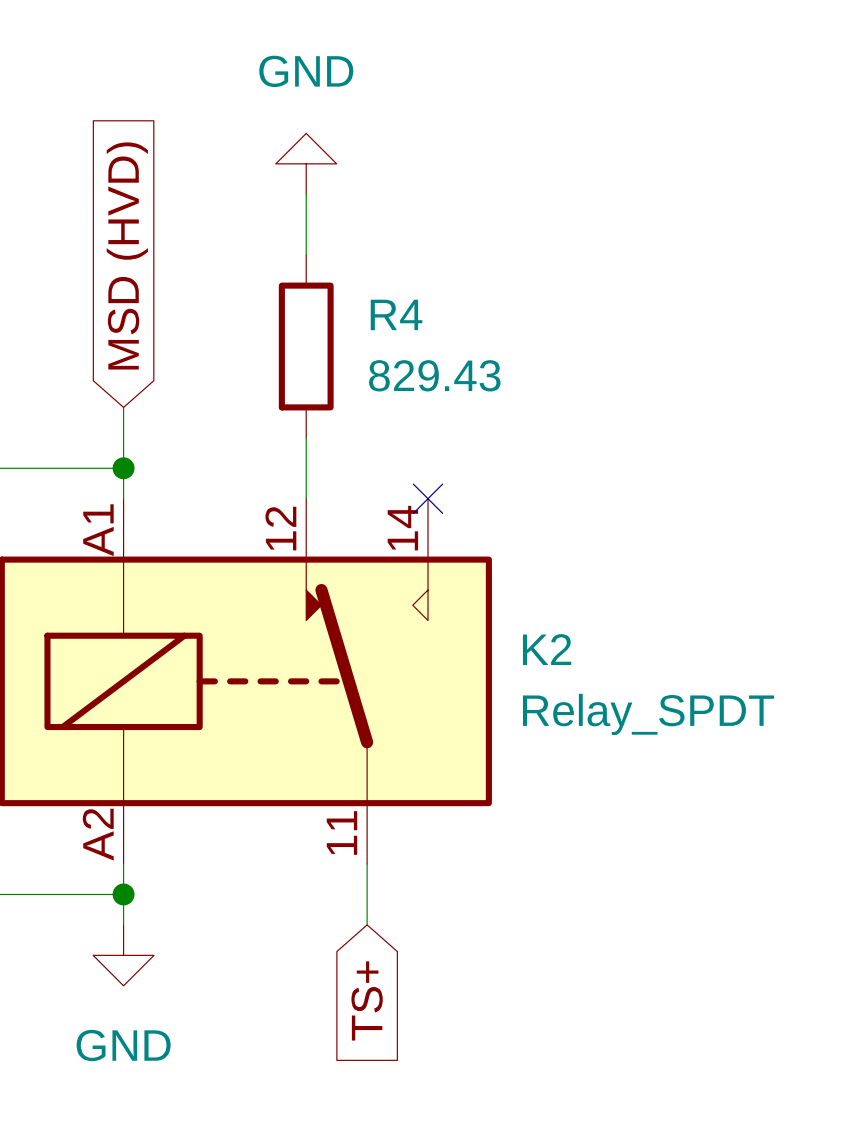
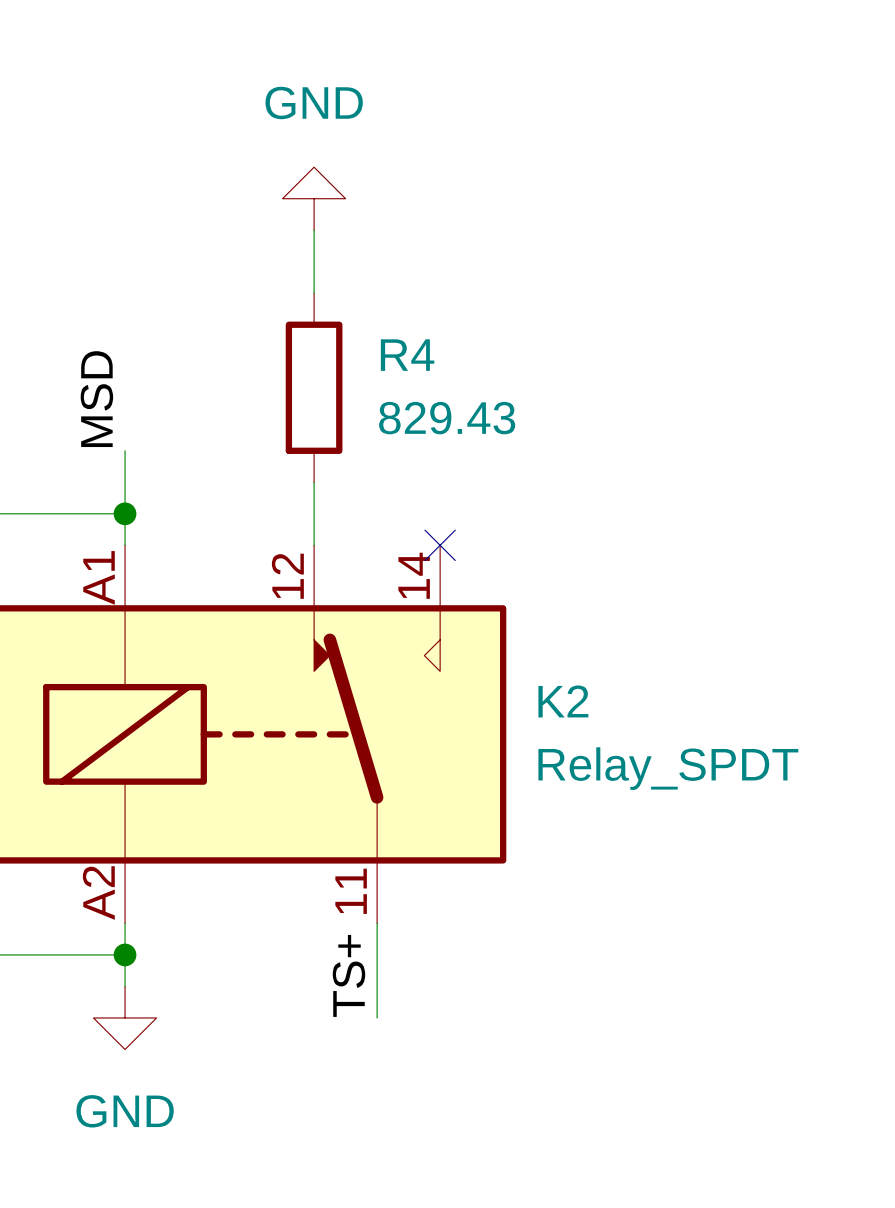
global label: MSD (HVD) (127, 255) -> none
label: none -> MSD (96, 399)
label: none -> TS+ (348, 975)
wire: none -> (377, 986) (377, 1017)
global label: TS+ (367, 1000) -> none

